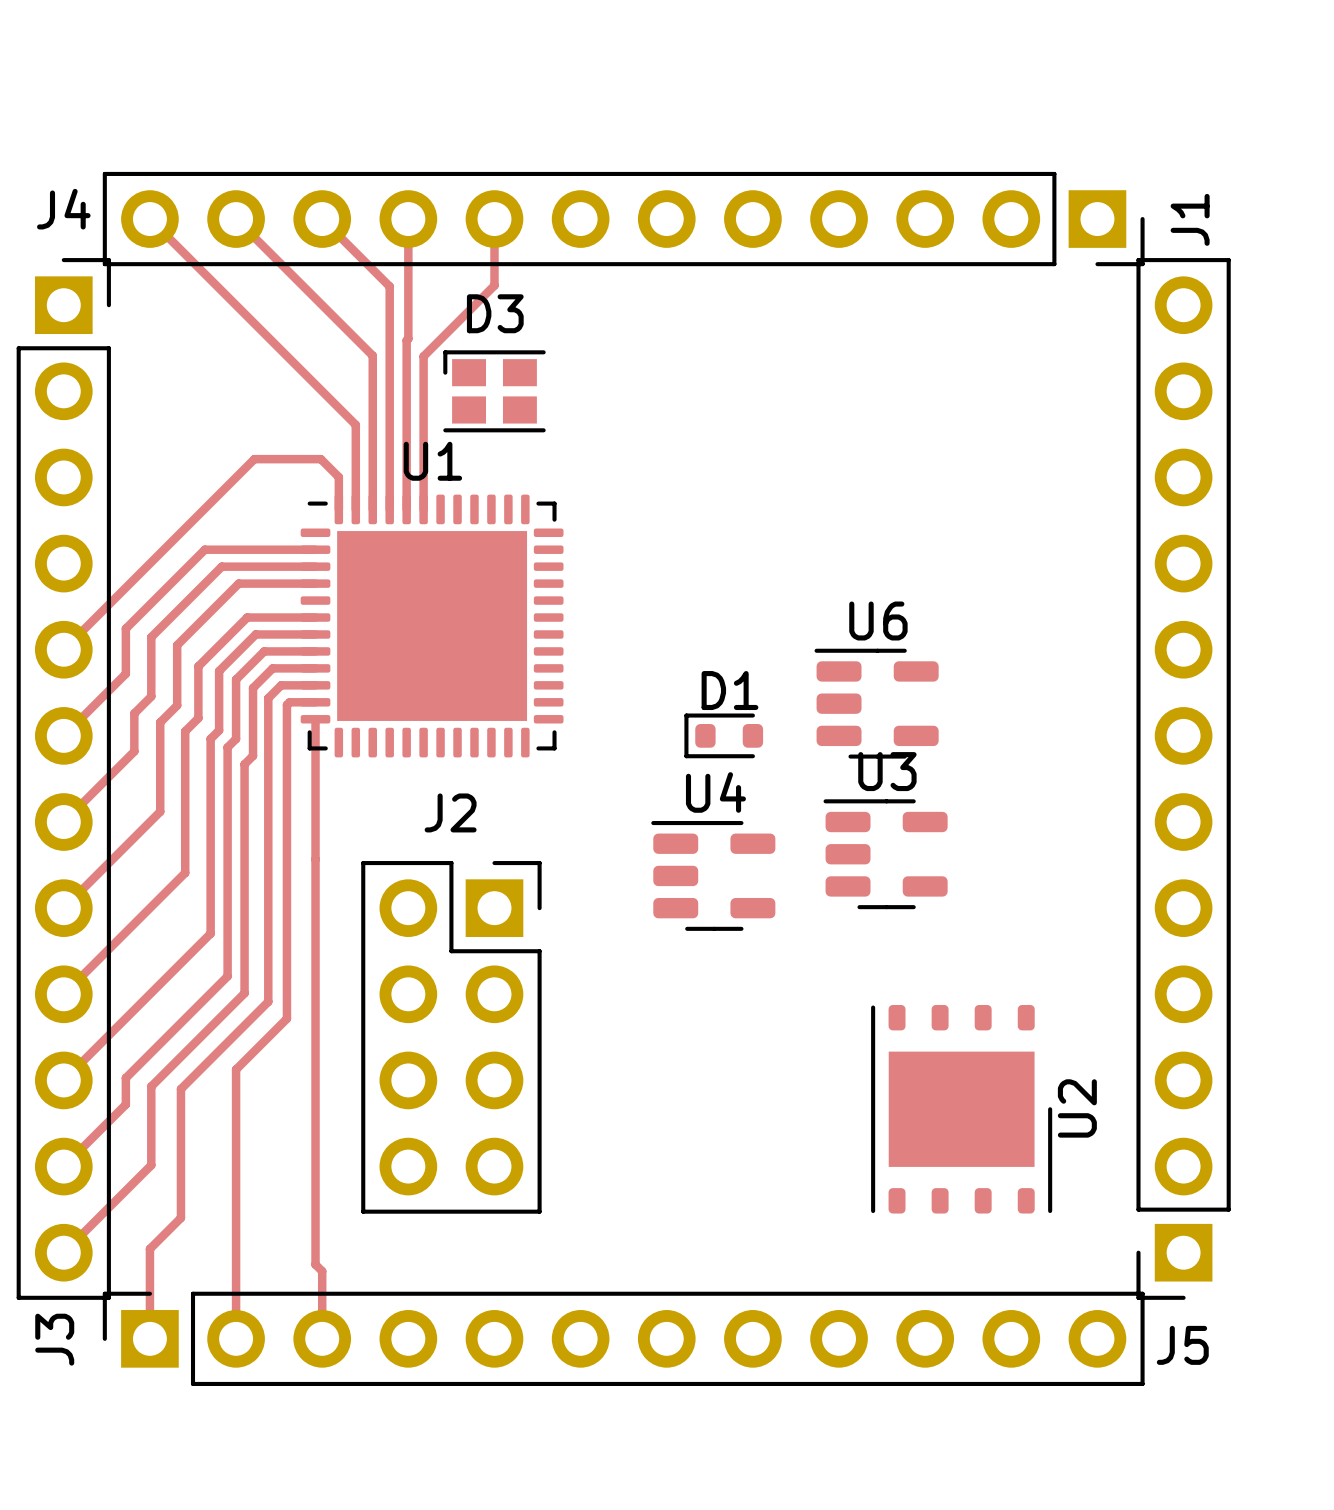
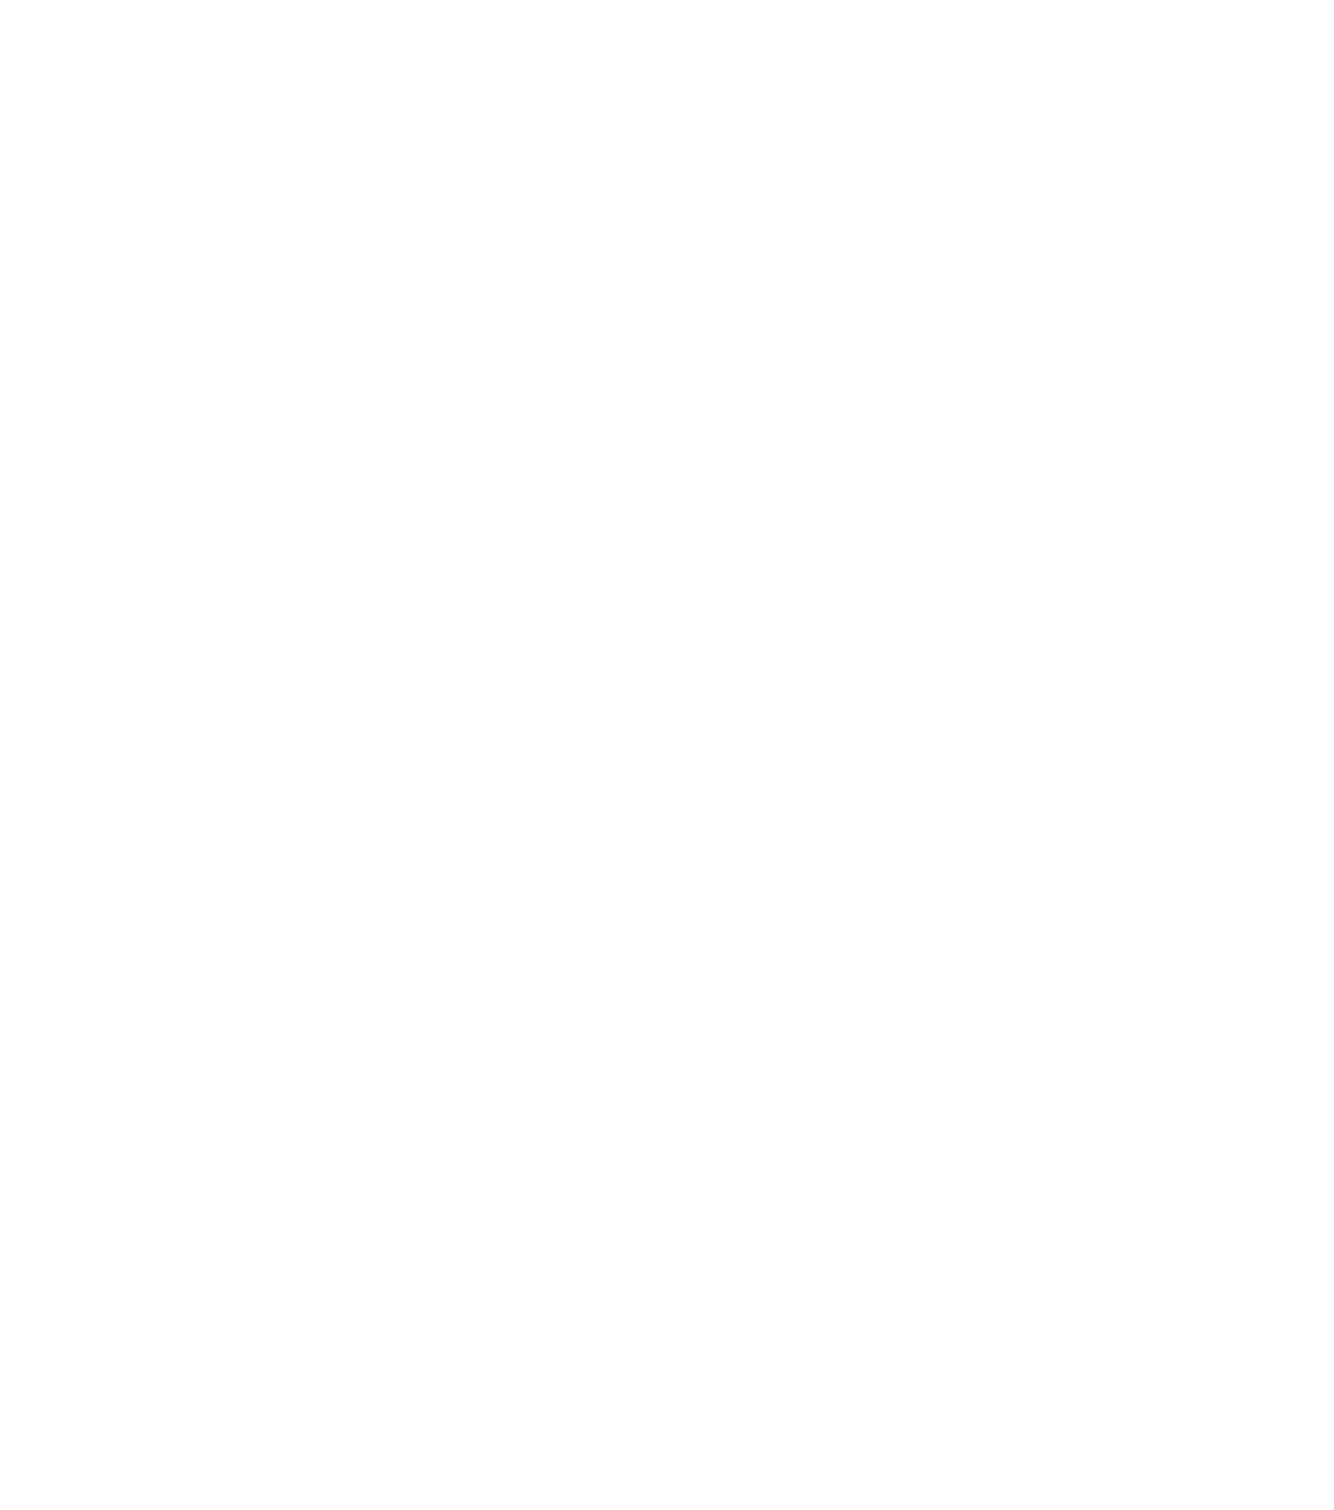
track: (149, 219) (355, 424) (355, 509) -> none
track: (236, 219) (372, 355) (372, 509) -> none
track: (322, 219) (389, 286) (389, 509) -> none
track: (408, 219) (406, 509) -> none
track: (494, 219) (494, 285) (423, 356) (423, 509) -> none
J1: (623, 219) -> none
D3: (494, 391) -> none
track: (338, 509) (338, 477) (320, 459) (254, 459) (63, 649) -> none
track: (315, 549) (204, 549) (125, 628) (125, 673) (63, 735) -> none
track: (315, 566) (221, 566) (151, 637) (151, 696) (134, 713) (134, 751) (63, 822) -> none
track: (315, 583) (238, 583) (177, 645) (177, 705) (160, 722) (160, 811) (63, 908) -> none
track: (315, 617) (247, 617) (198, 666) (198, 718) (185, 731) (185, 872) (63, 994) -> none
U1: (432, 626) -> none
track: (315, 634) (255, 634) (219, 671) (219, 730) (210, 738) (210, 933) (63, 1080) -> none
track: (315, 651) (264, 651) (236, 679) (236, 738) (227, 747) (227, 976) (125, 1078) (125, 1104) (63, 1166) -> none
track: (315, 668) (272, 668) (253, 688) (253, 755) (244, 764) (244, 993) (151, 1086) (151, 1165) (63, 1252) -> none
track: (315, 685) (281, 685) (268, 698) (268, 1001) (180, 1089) (180, 1217) (149, 1248) (149, 1338) -> none
track: (315, 702) (289, 702) (286, 705) (286, 1018) (236, 1069) (236, 1338) -> none
U6: (876, 703) -> none
track: (315, 719) (315, 1264) (322, 1271) (322, 1338) -> none
D1: (723, 735) -> none
J4: (63, 778) -> none
J5: (1183, 778) -> none
U3: (885, 854) -> none
U4: (713, 875) -> none
J2: (451, 1037) -> none
U2: (961, 1109) -> none
J3: (623, 1338) -> none

